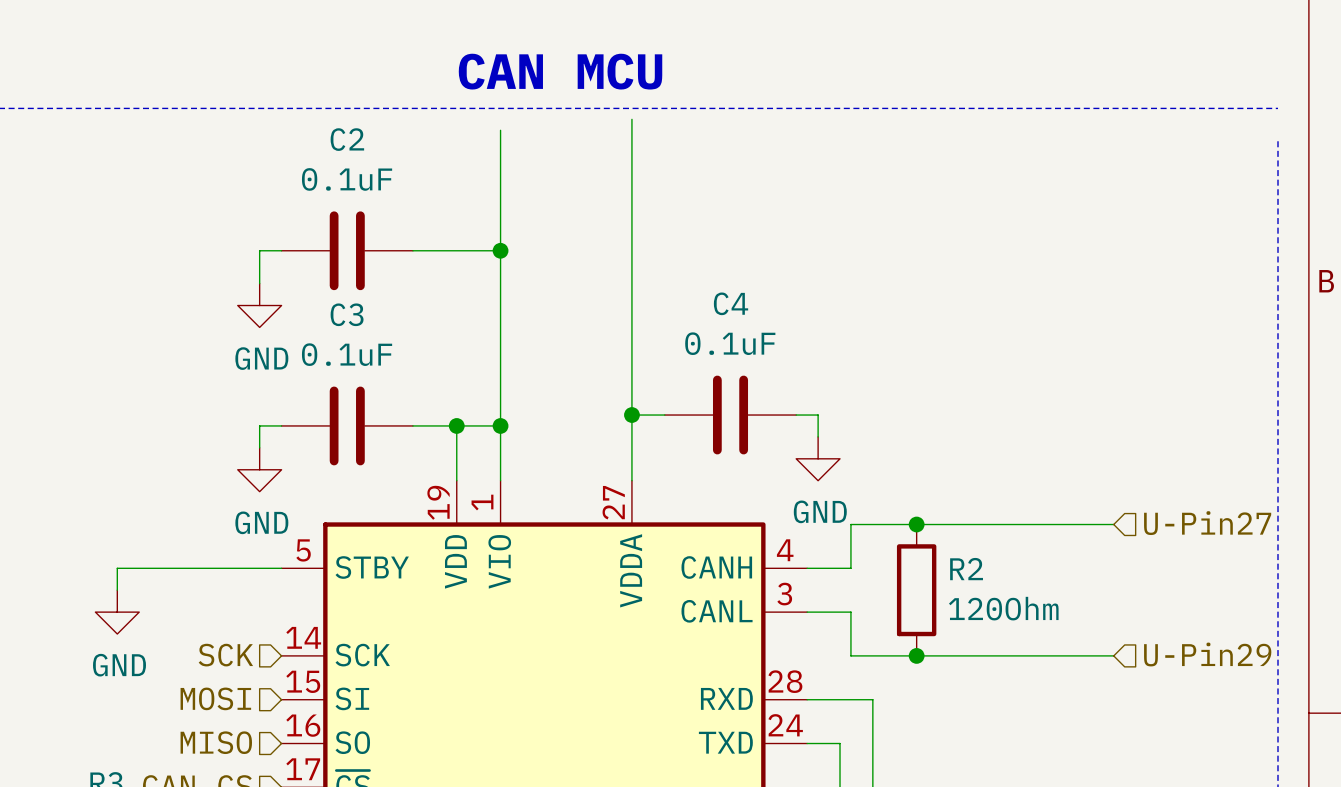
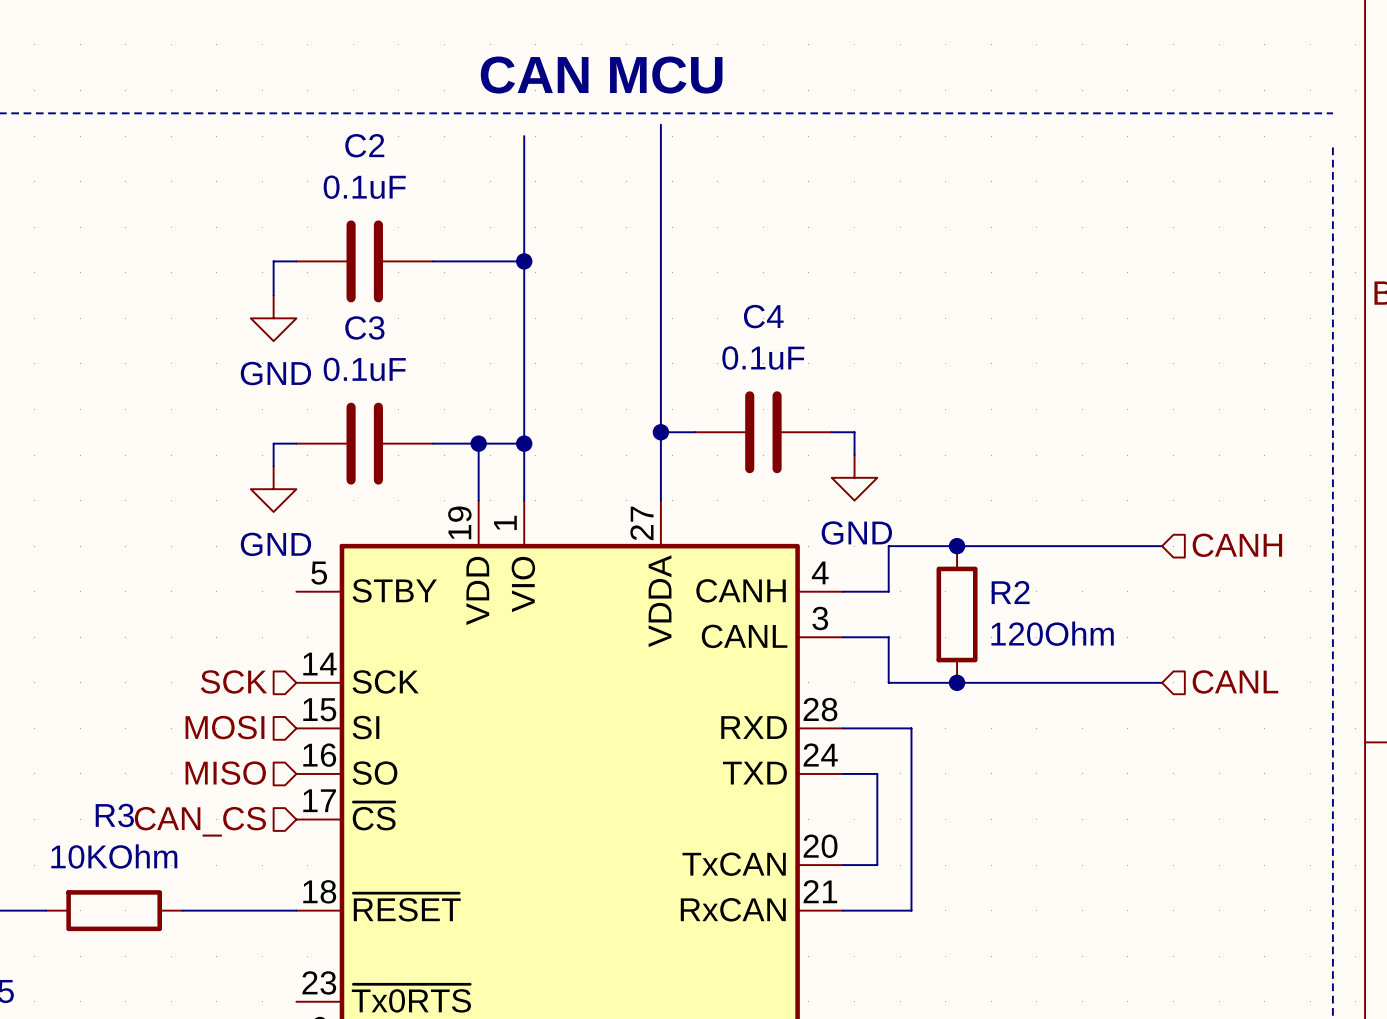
hierarchical label: U-Pin27 (1207, 523) -> CANH (1237, 545)
wire: (281, 568) (117, 568) (117, 590) -> none
power symbol: GND (117, 612) -> none
hierarchical label: U-Pin29 (1207, 654) -> CANL (1235, 681)

